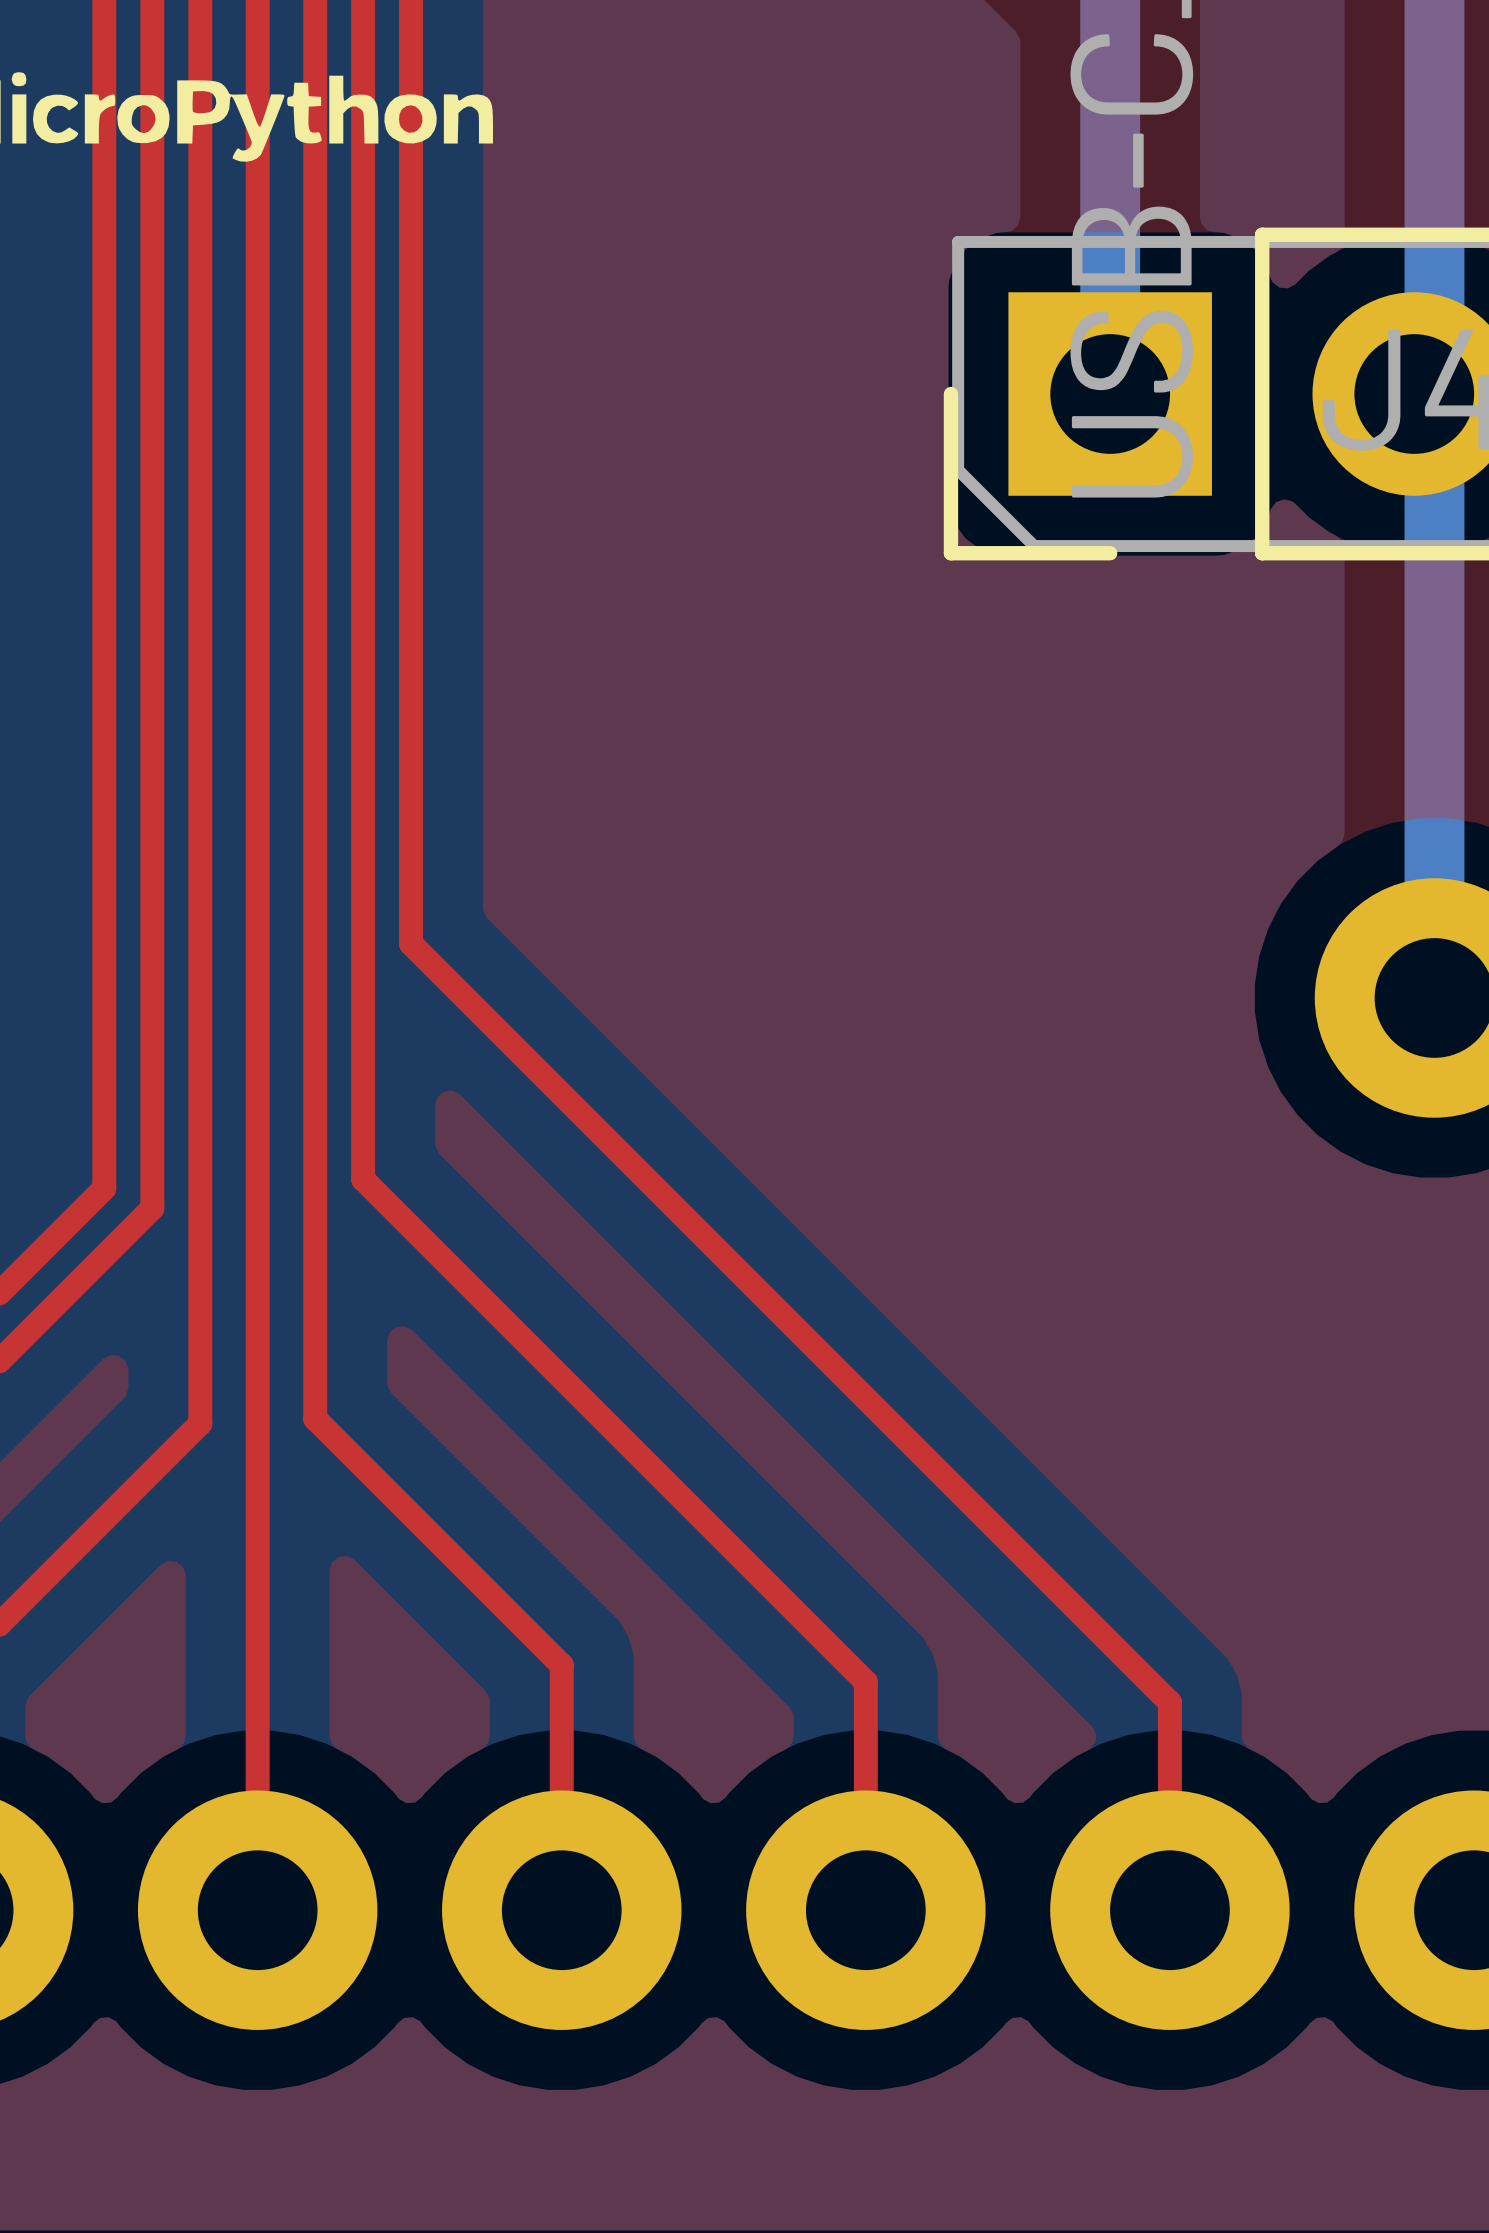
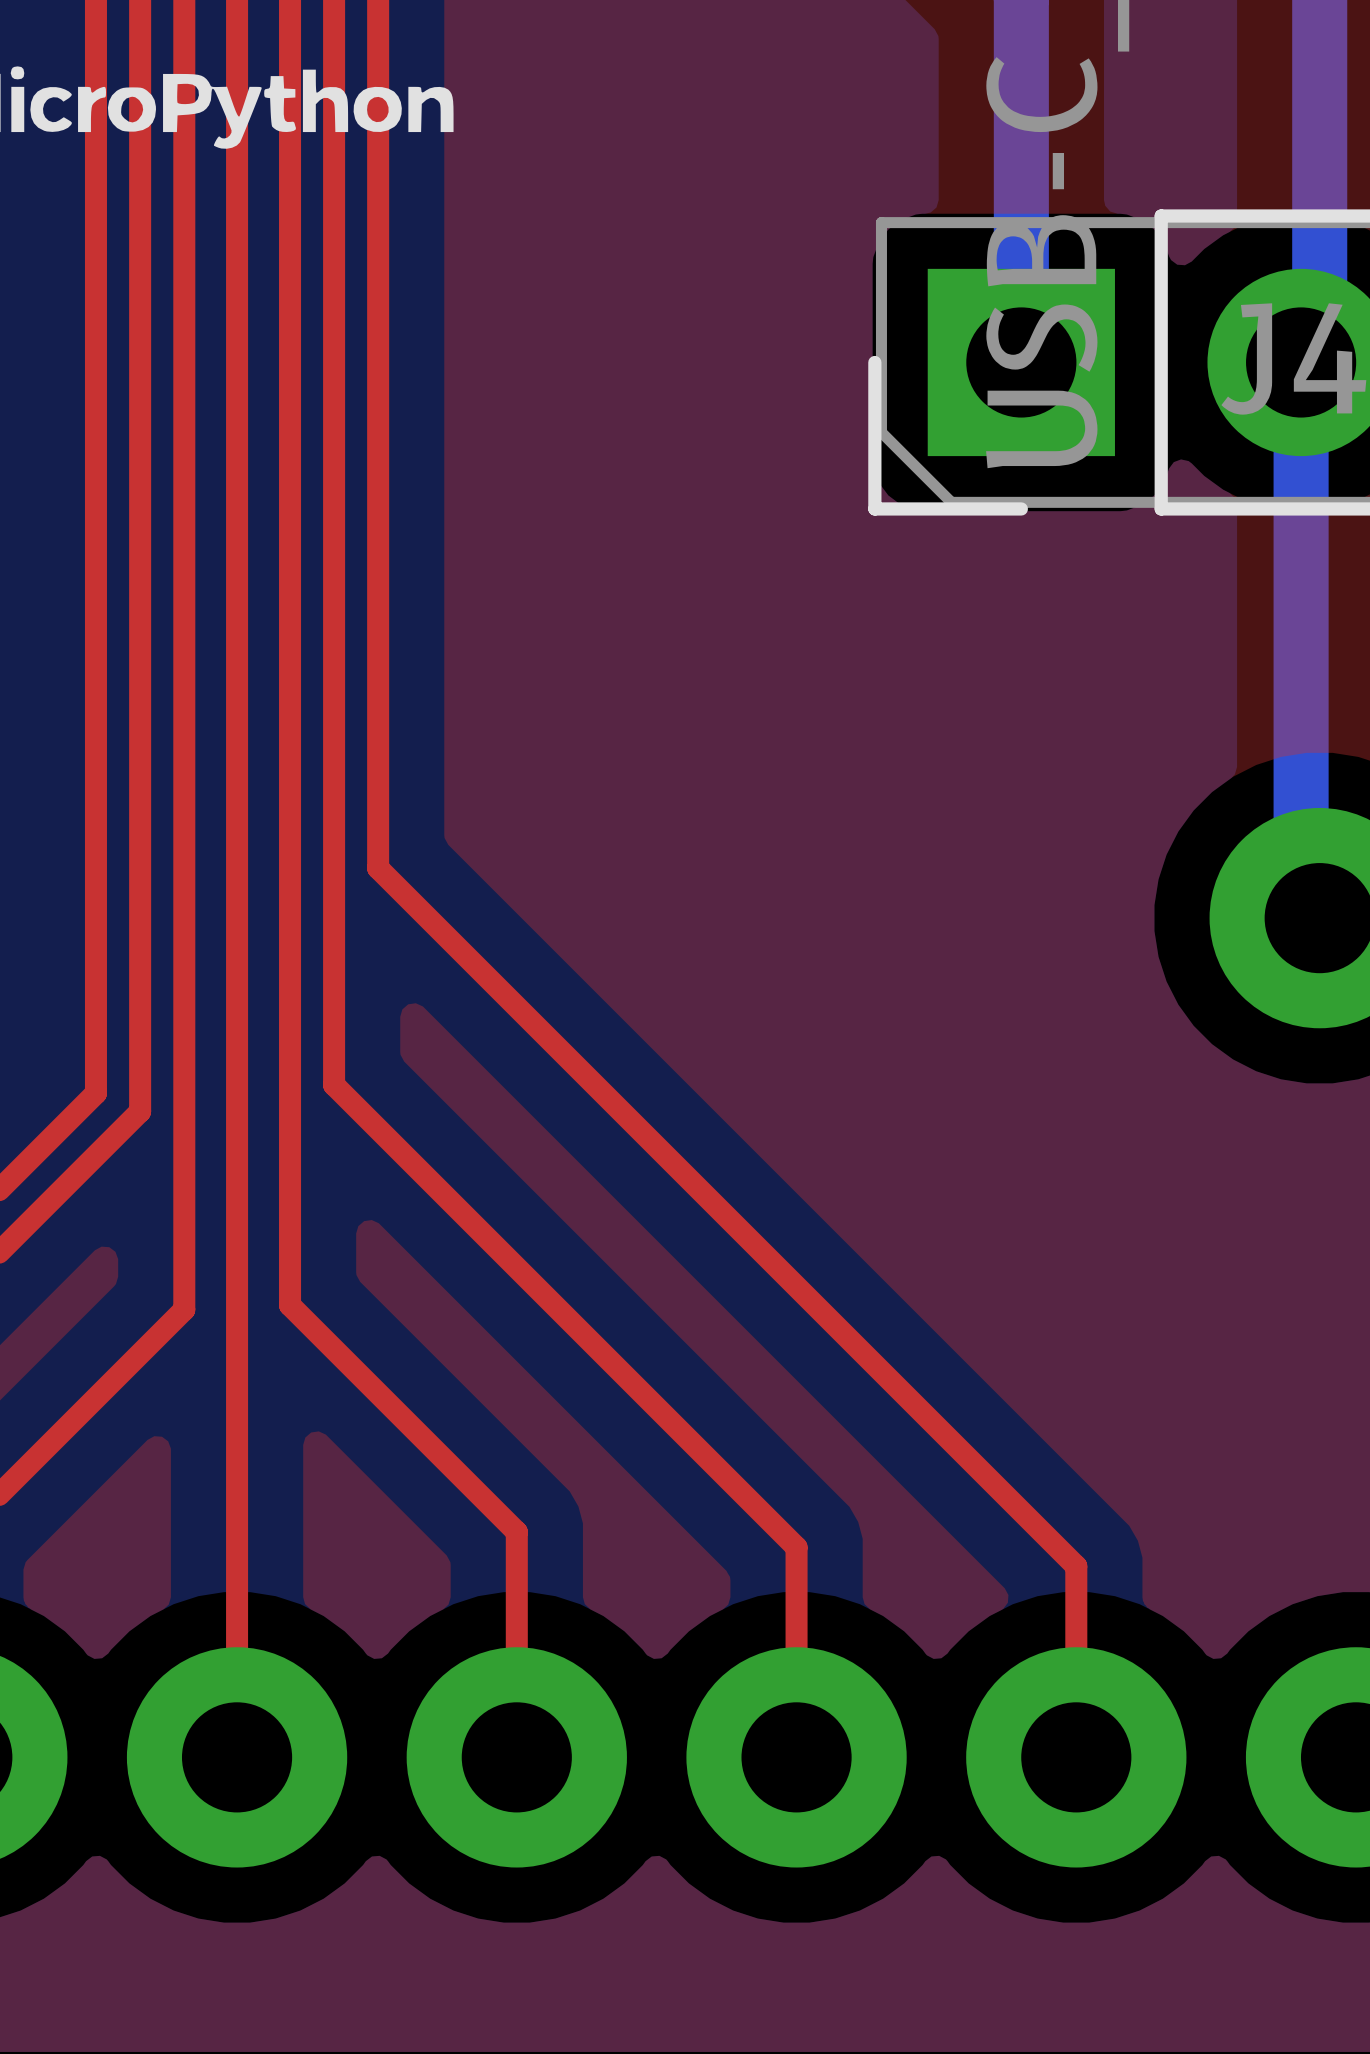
bottom track: (1414, 394) (1434, 414) (1434, 997) -> (1301, 362) (1301, 899) (1319, 918)

